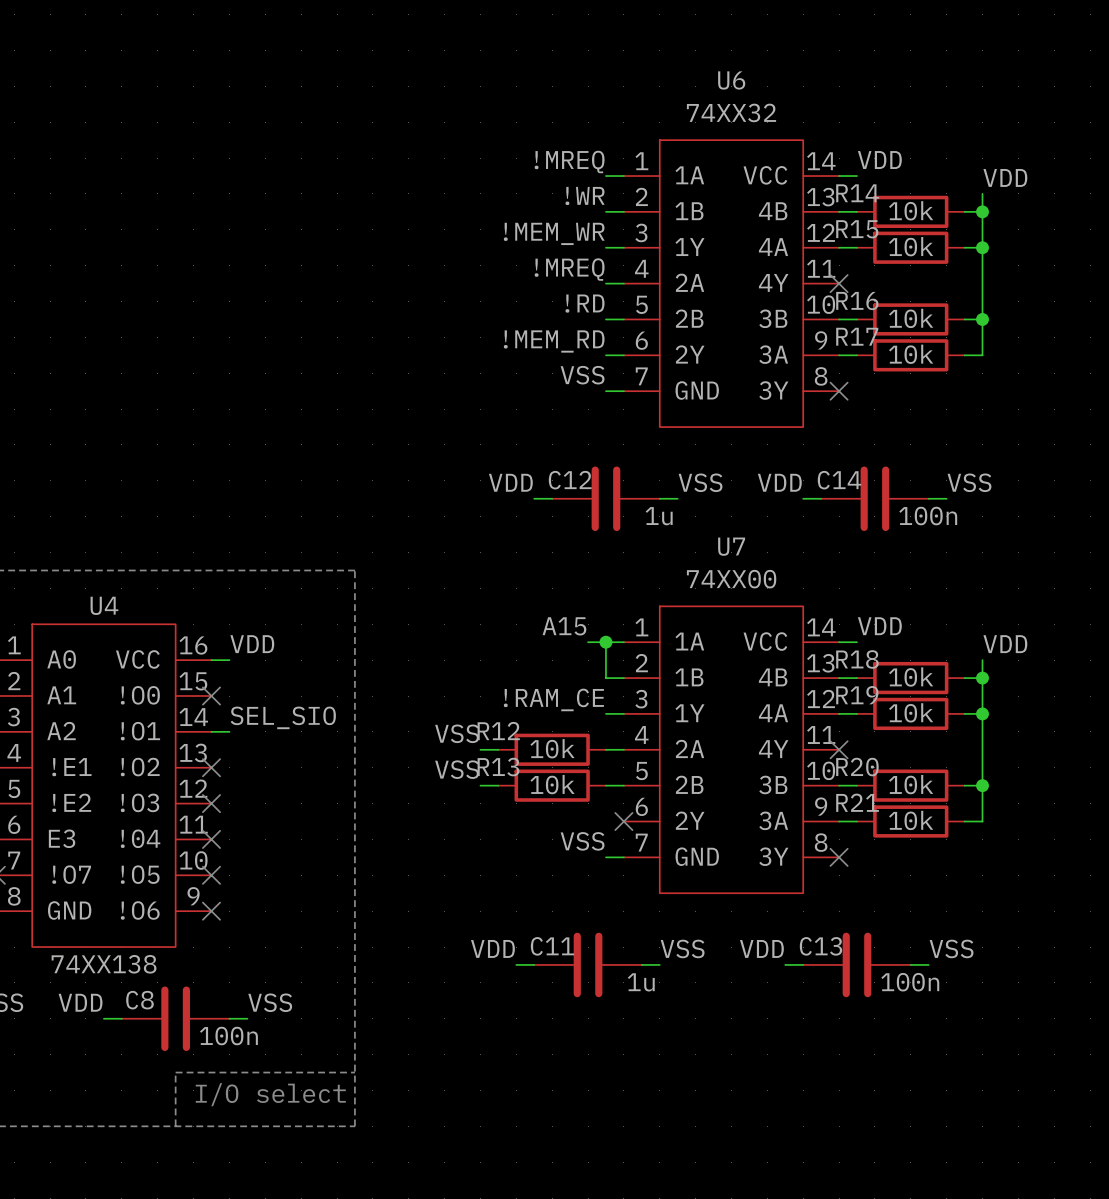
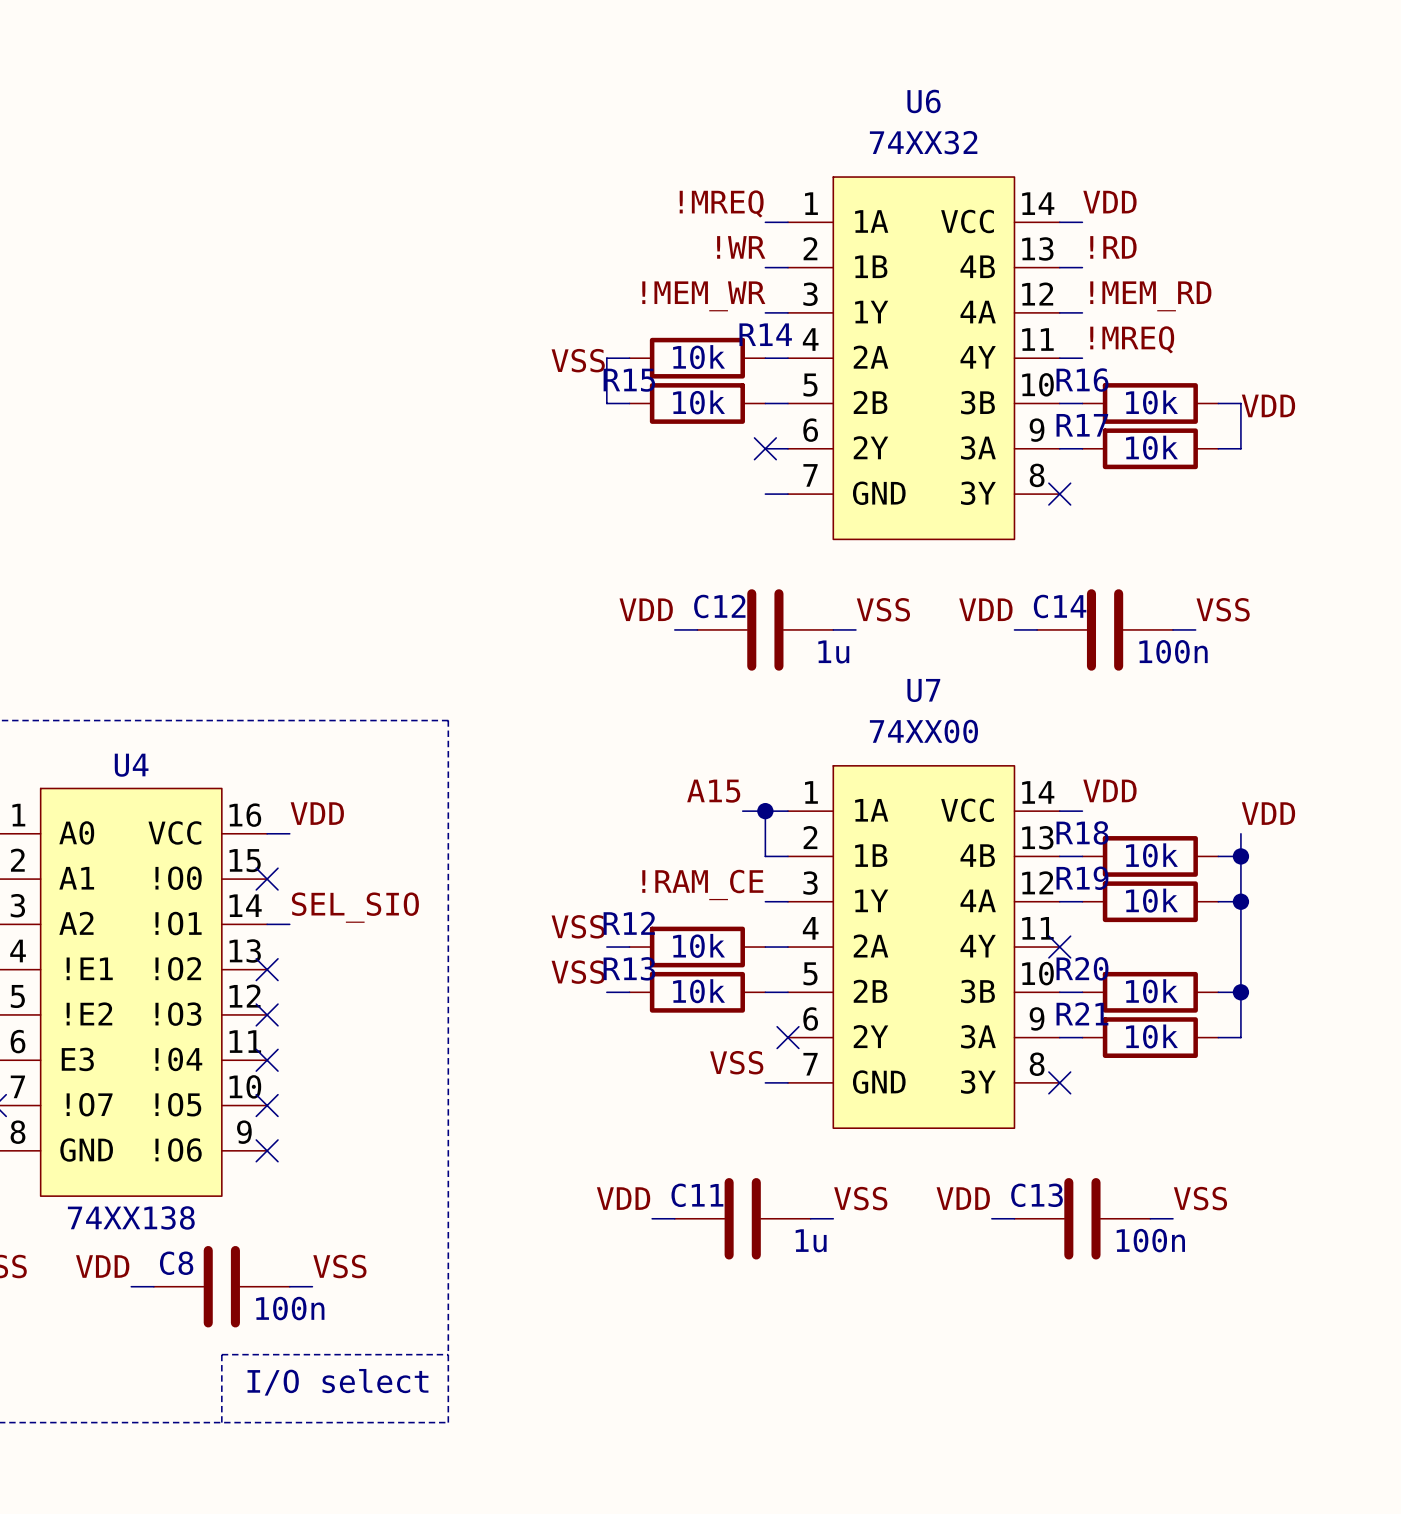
label position: VDD (1005, 177) -> VDD (1268, 405)
R14 name position: R14 (857, 193) -> R14 (765, 334)
wire: (982, 193) (982, 319) -> none
R14 position: (910, 211) -> (697, 358)
wire: (964, 211) (982, 211) -> none
junction: (982, 211) -> none
R15 position: (910, 247) -> (697, 403)
wire: (964, 247) (982, 247) -> (1059, 358) (1082, 358)
junction: (982, 247) -> none
label position: !MREQ (569, 269) -> !MREQ (1132, 339)
wire: none -> (629, 358) (606, 358) (606, 403) (629, 403)
no-connect mark: (839, 283) -> none
label position: !RD (585, 303) -> !RD (1113, 247)
junction: (982, 319) -> none
label position: !MEM_RD (554, 341) -> !MEM_RD (1150, 296)
no-connect mark: none -> (765, 448)
label position: VSS (582, 375) -> VSS (578, 360)

